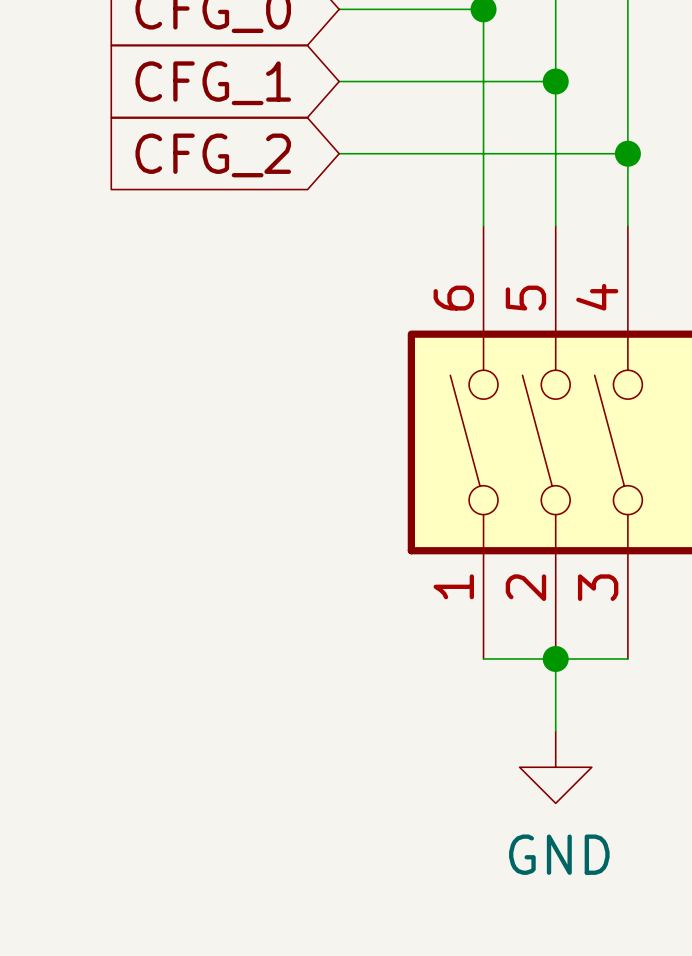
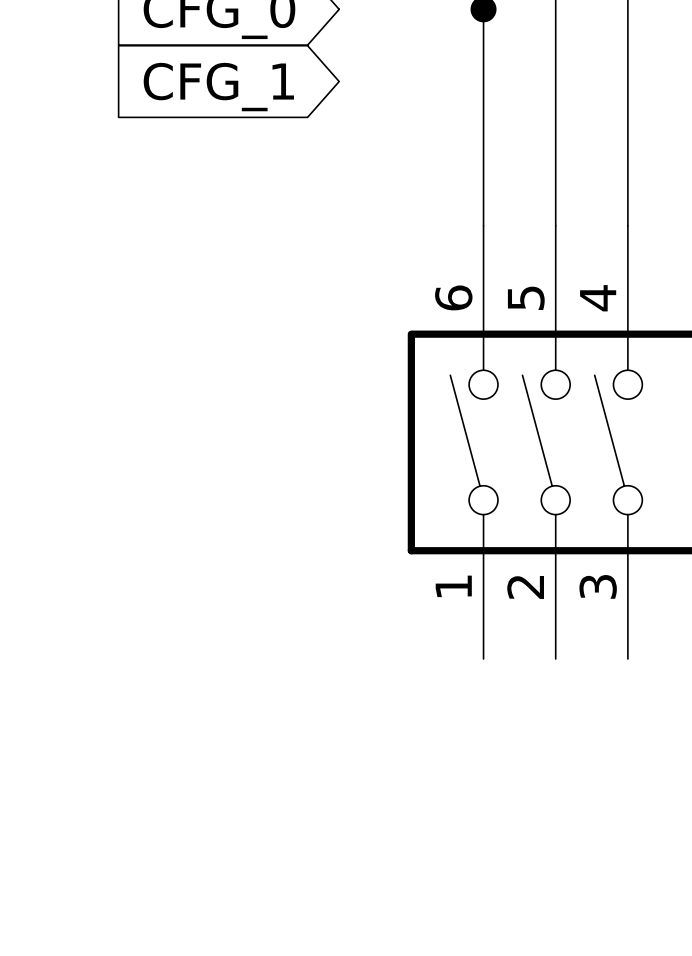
wire: (339, 9) (483, 9) -> none
wire: (339, 81) (555, 81) -> none
junction: (555, 81) -> none
wire: (339, 153) (627, 153) -> none
junction: (627, 153) -> none
global label: CFG_2 (213, 155) -> none
wire: (483, 658) (627, 658) -> none
wire: (555, 658) (555, 731) -> none
junction: (555, 658) -> none
power symbol: GND (555, 767) -> none

